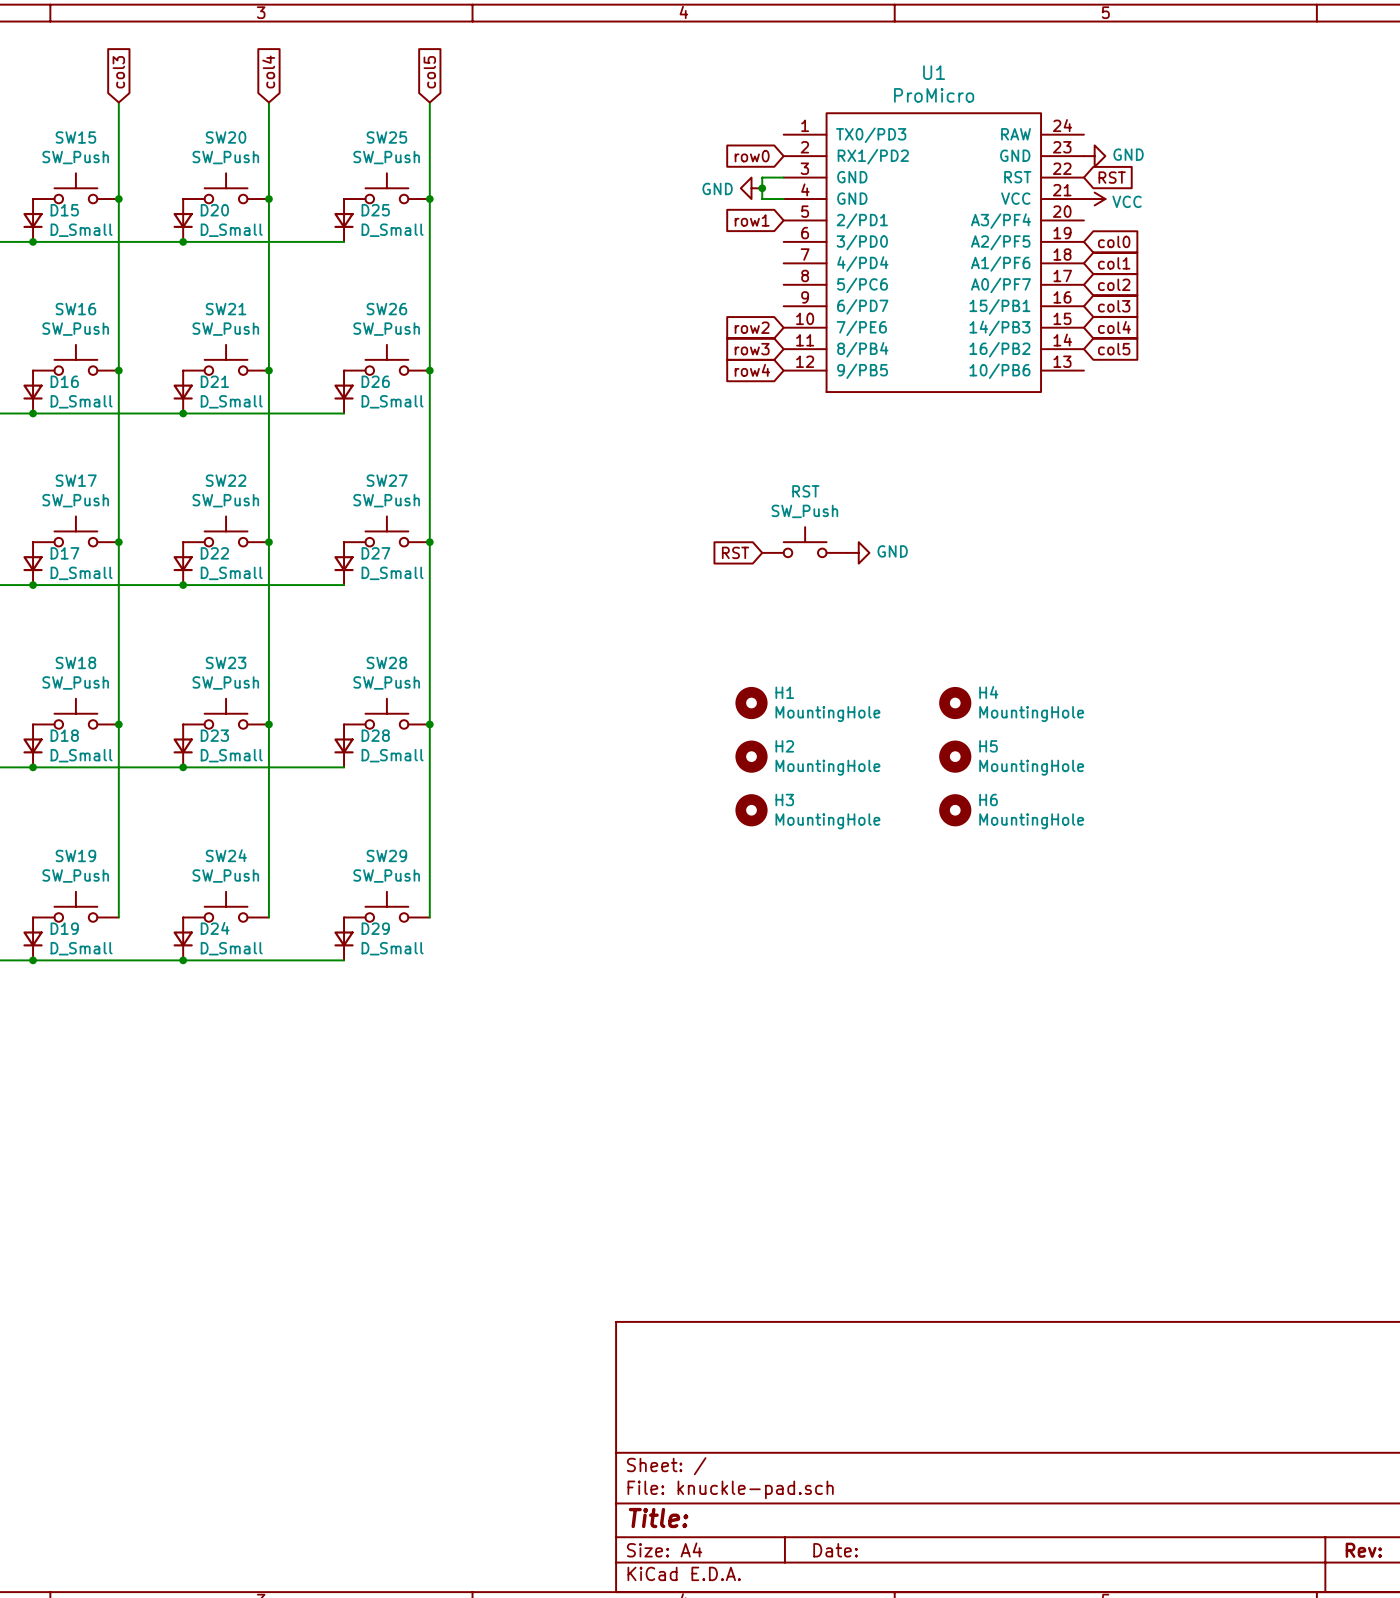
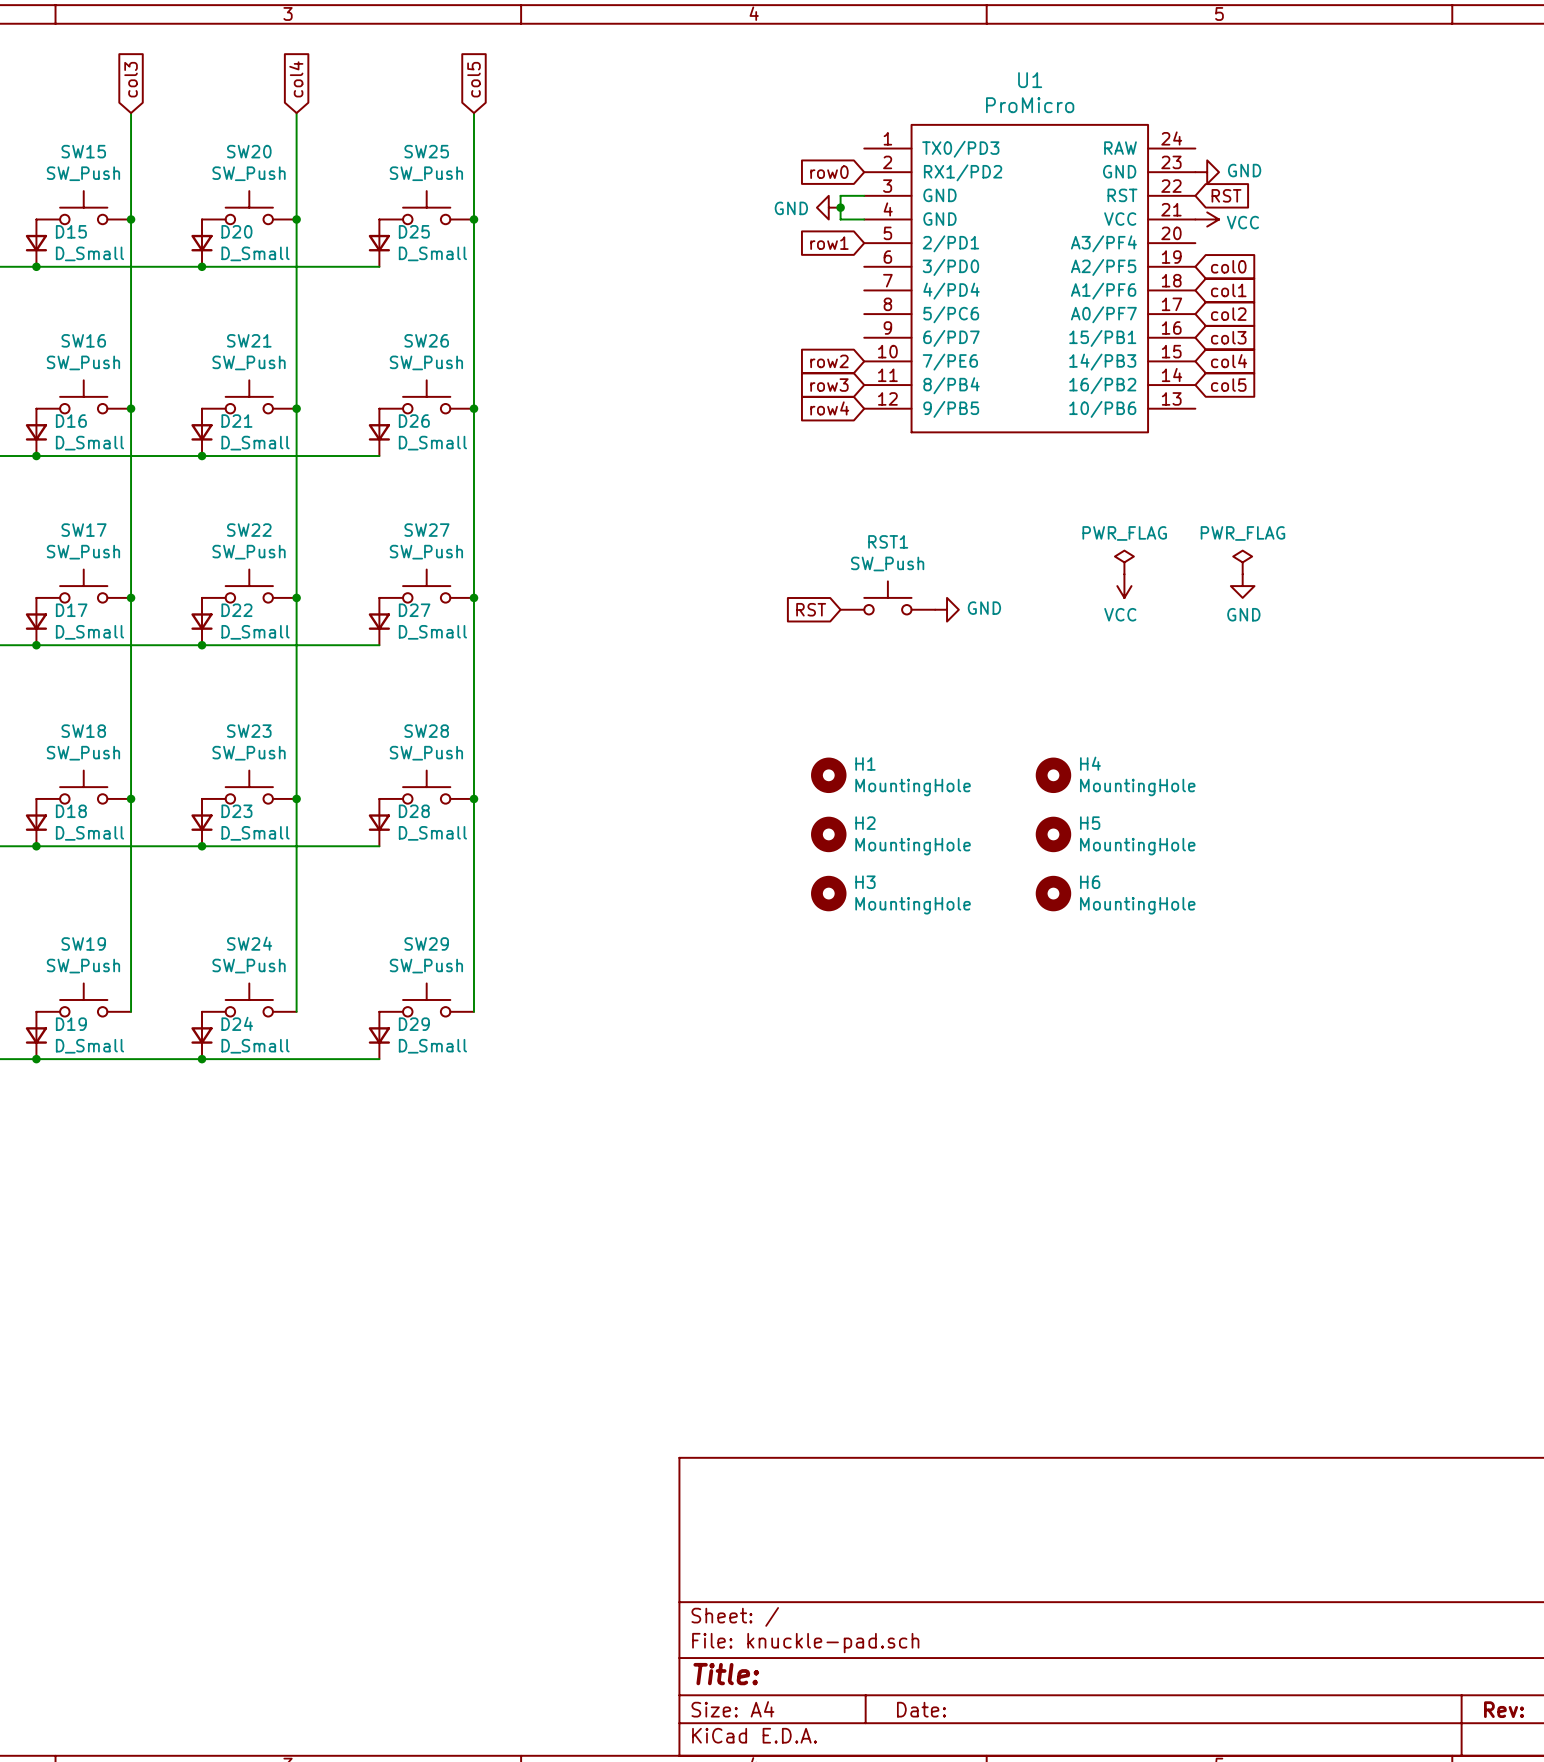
RST name: RST (805, 491) -> RST1 (888, 541)
power symbol: none -> PWR_FLAG (1124, 562)
power symbol: none -> PWR_FLAG (1242, 562)
power symbol: none -> VCC (1124, 586)
power symbol: none -> GND (1242, 586)

